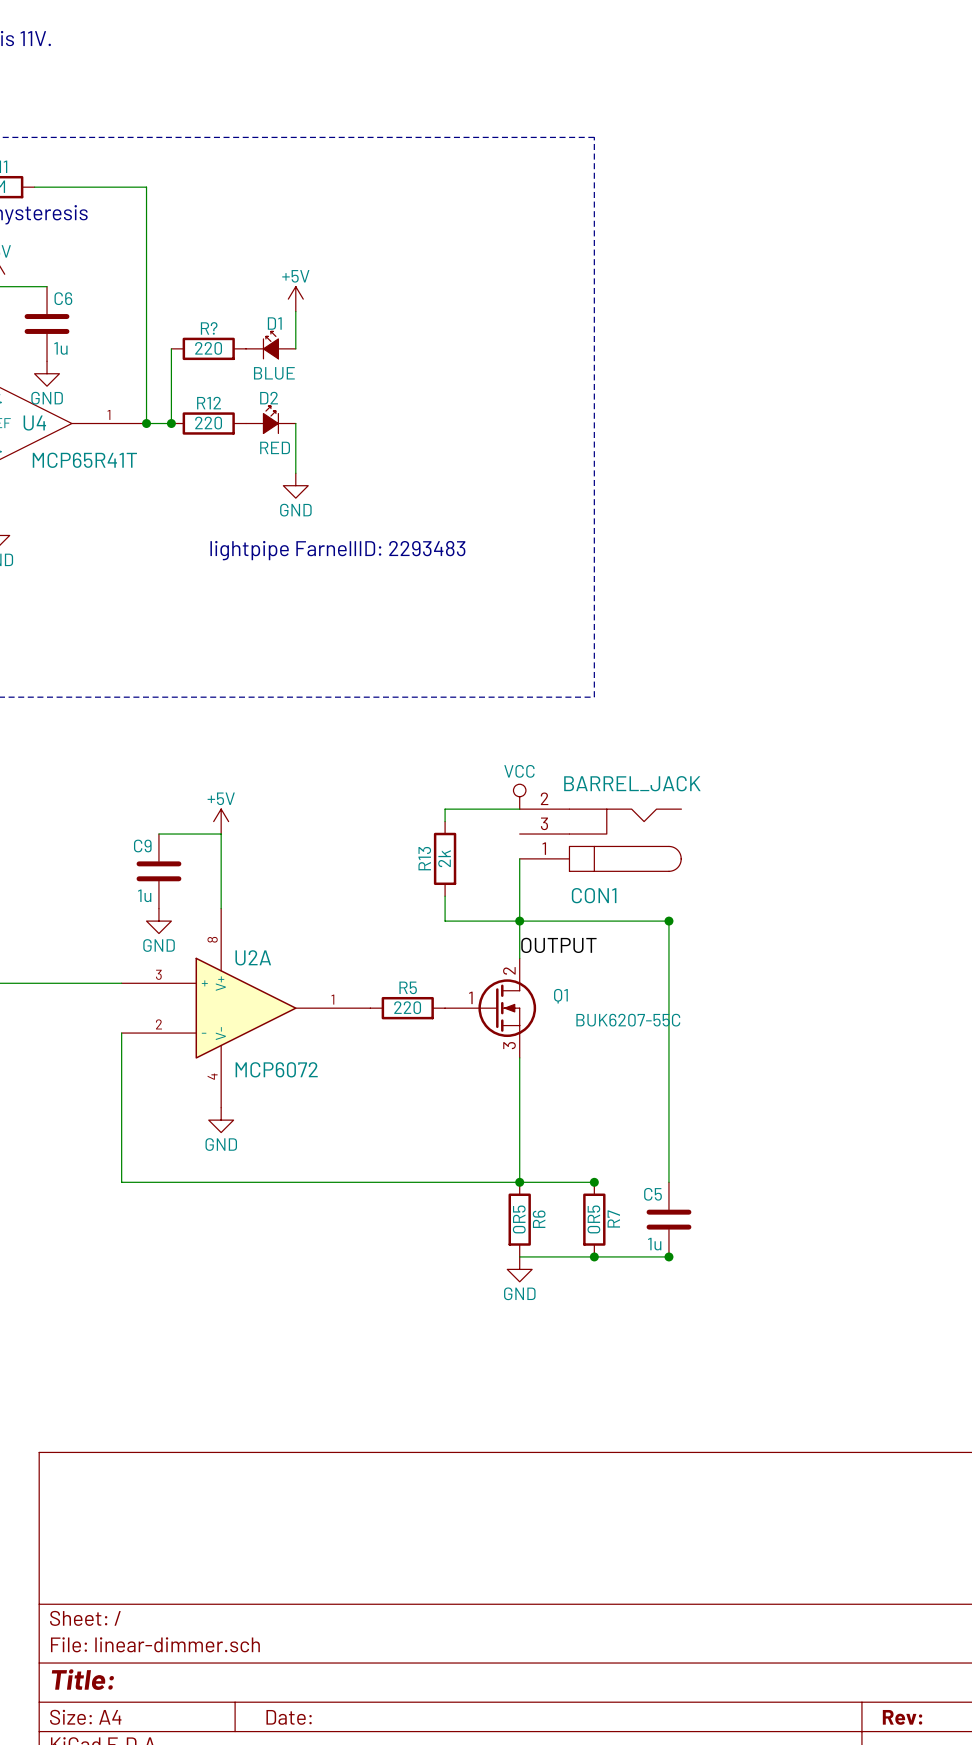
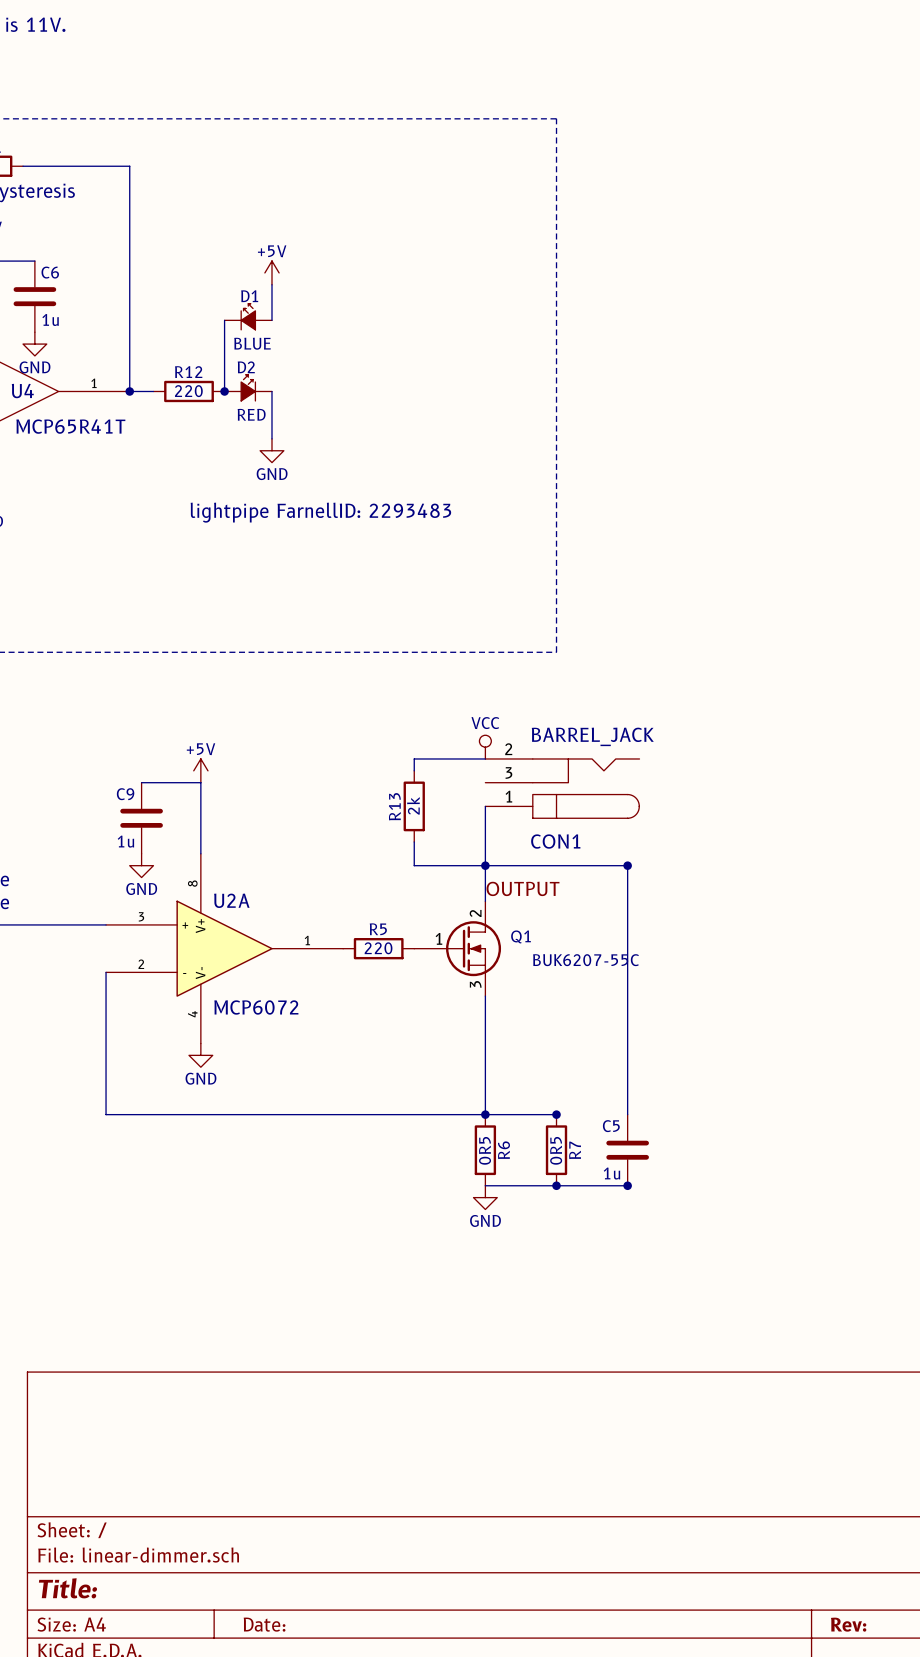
wire: (171, 348) (171, 423) -> (224, 320) (224, 391)
R?: 220 (208, 348) -> none
junction: (171, 423) -> none
junction: none -> (224, 391)

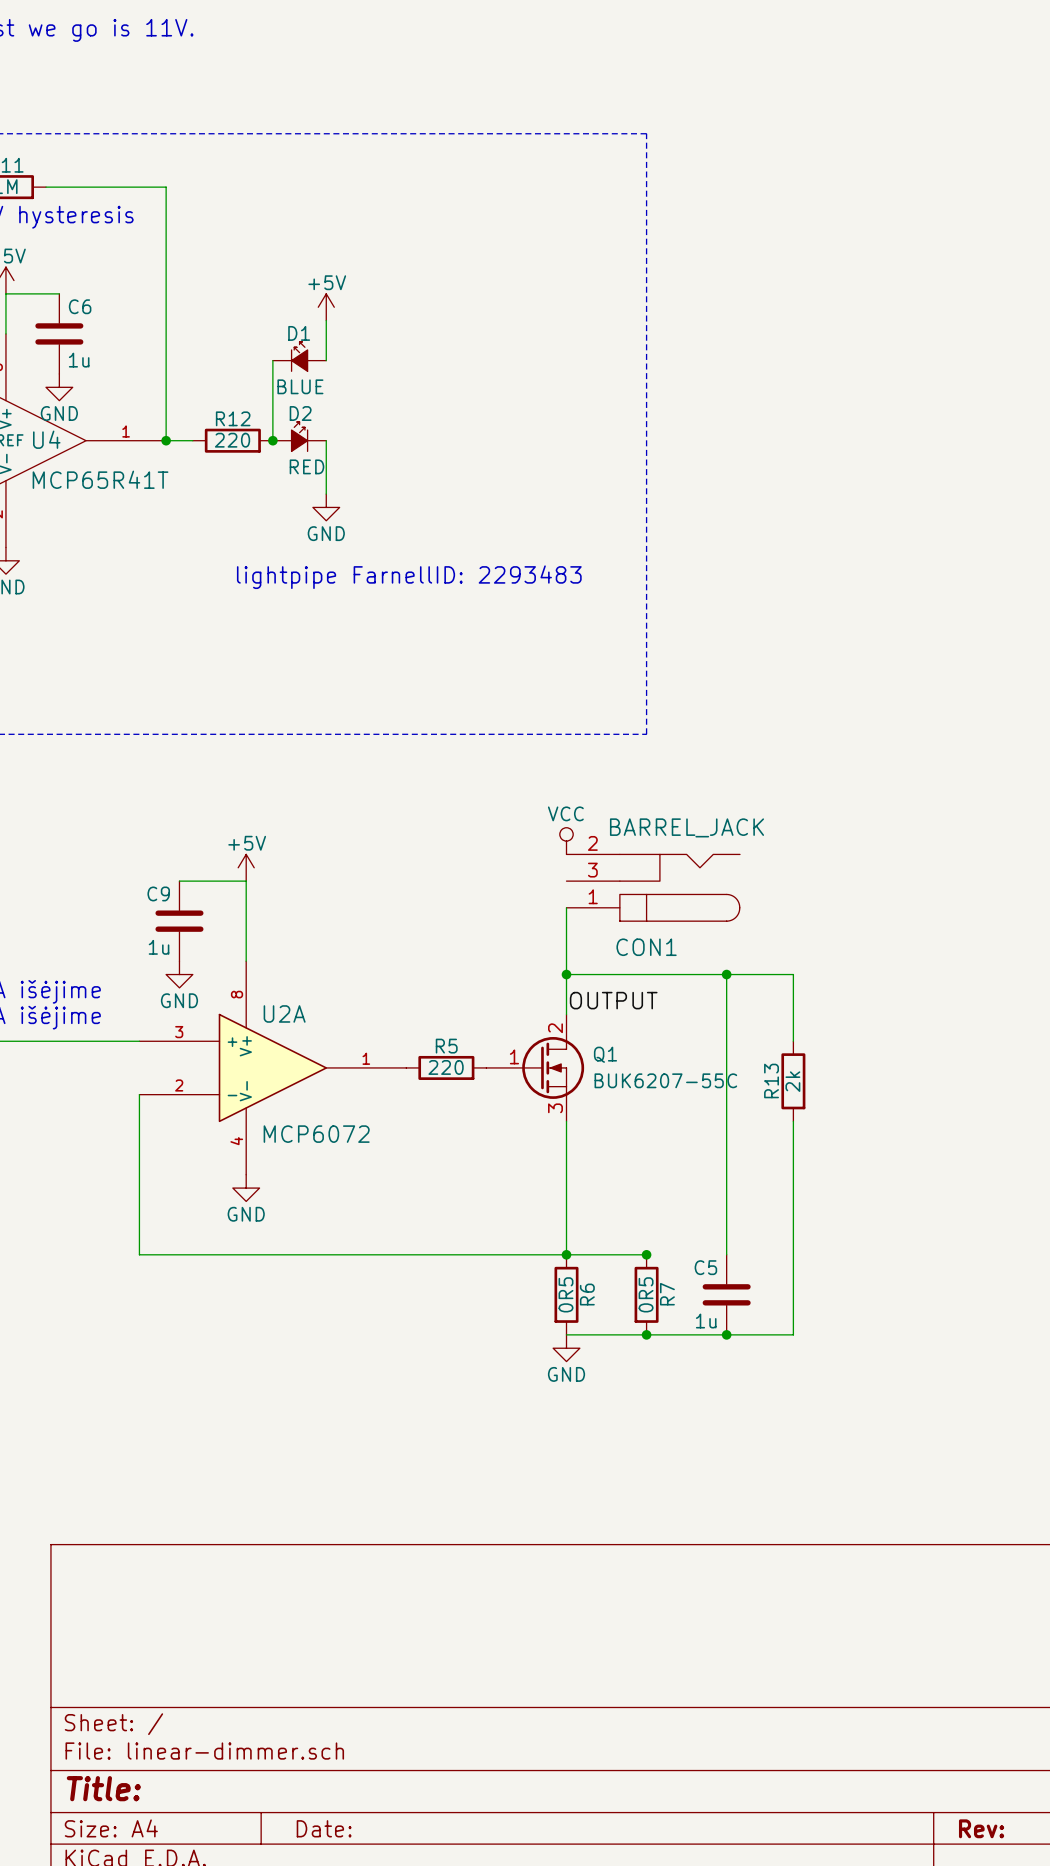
wire: (485, 758) (414, 758) (414, 770) -> none
R13 position: (414, 806) -> (793, 1081)
wire: (414, 841) (414, 865) (485, 865) -> none
wire: none -> (726, 974) (793, 974) (793, 1041)
wire: none -> (793, 1121) (793, 1334) (726, 1334)

